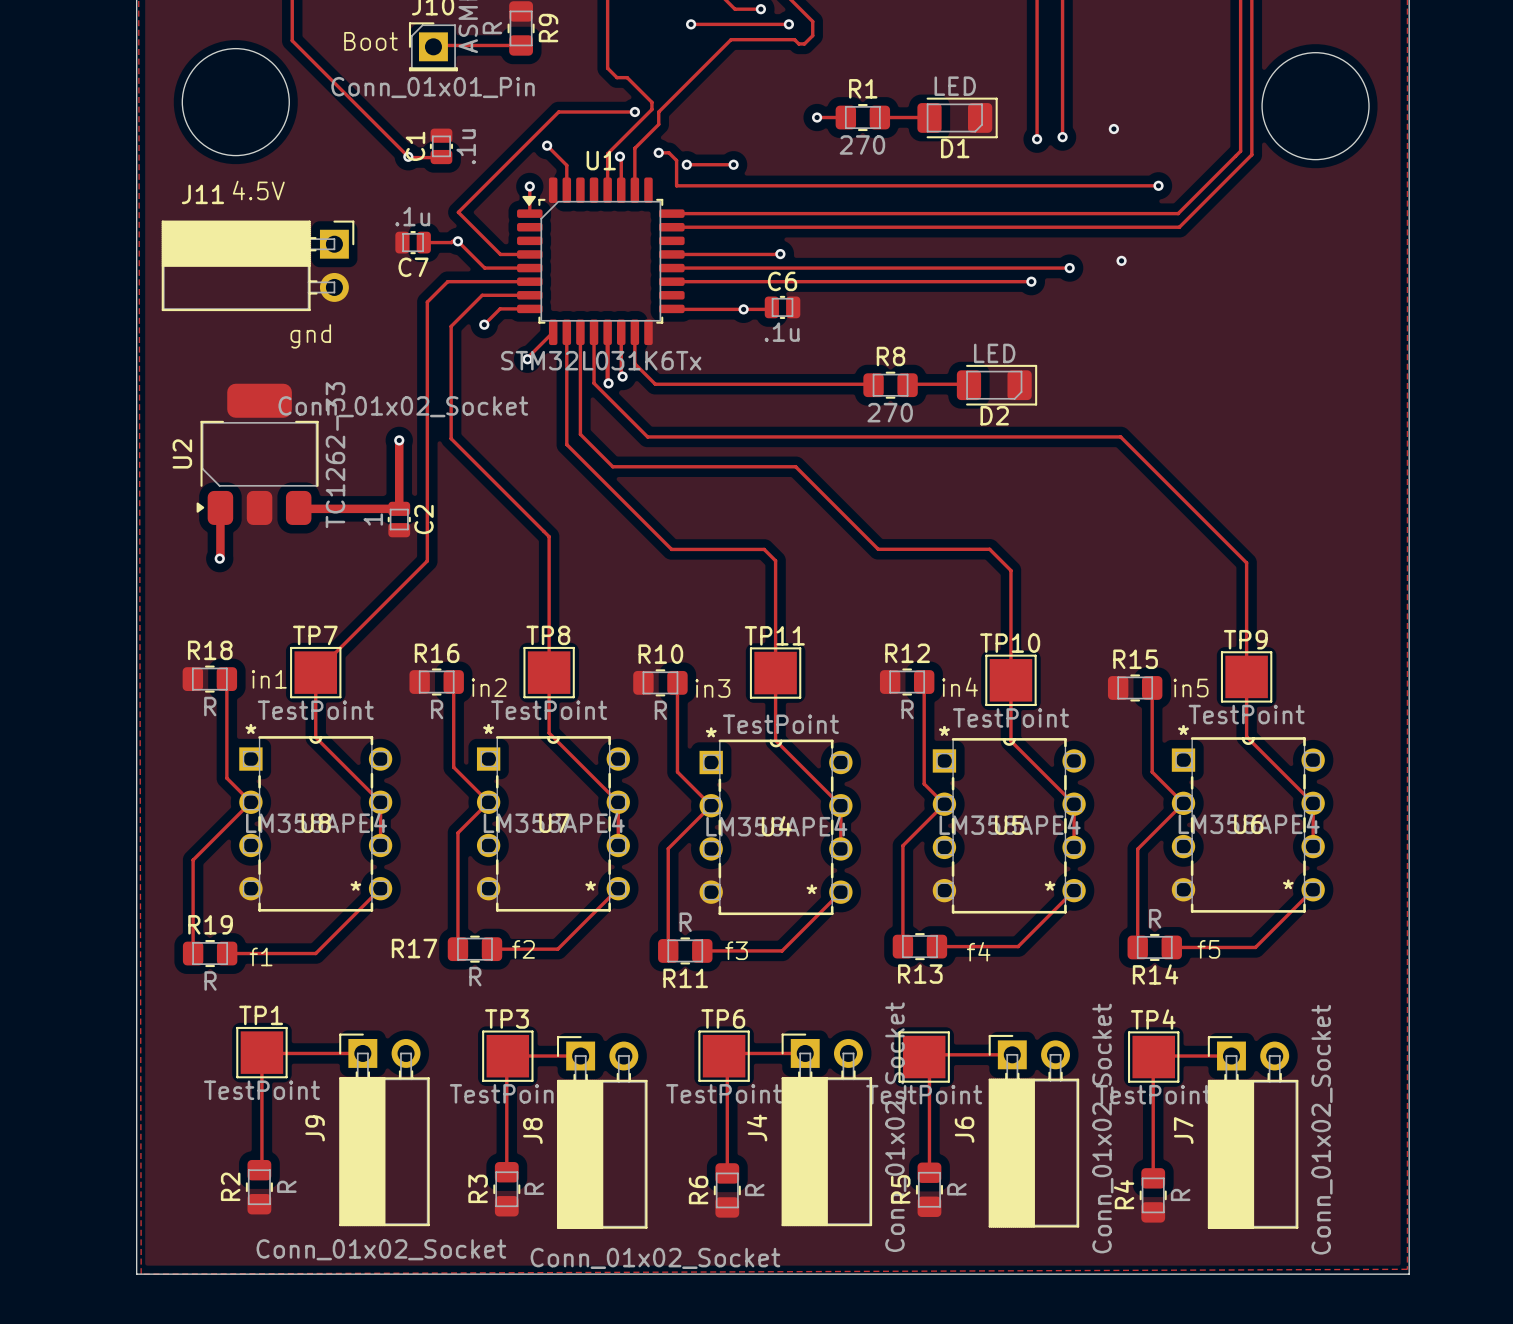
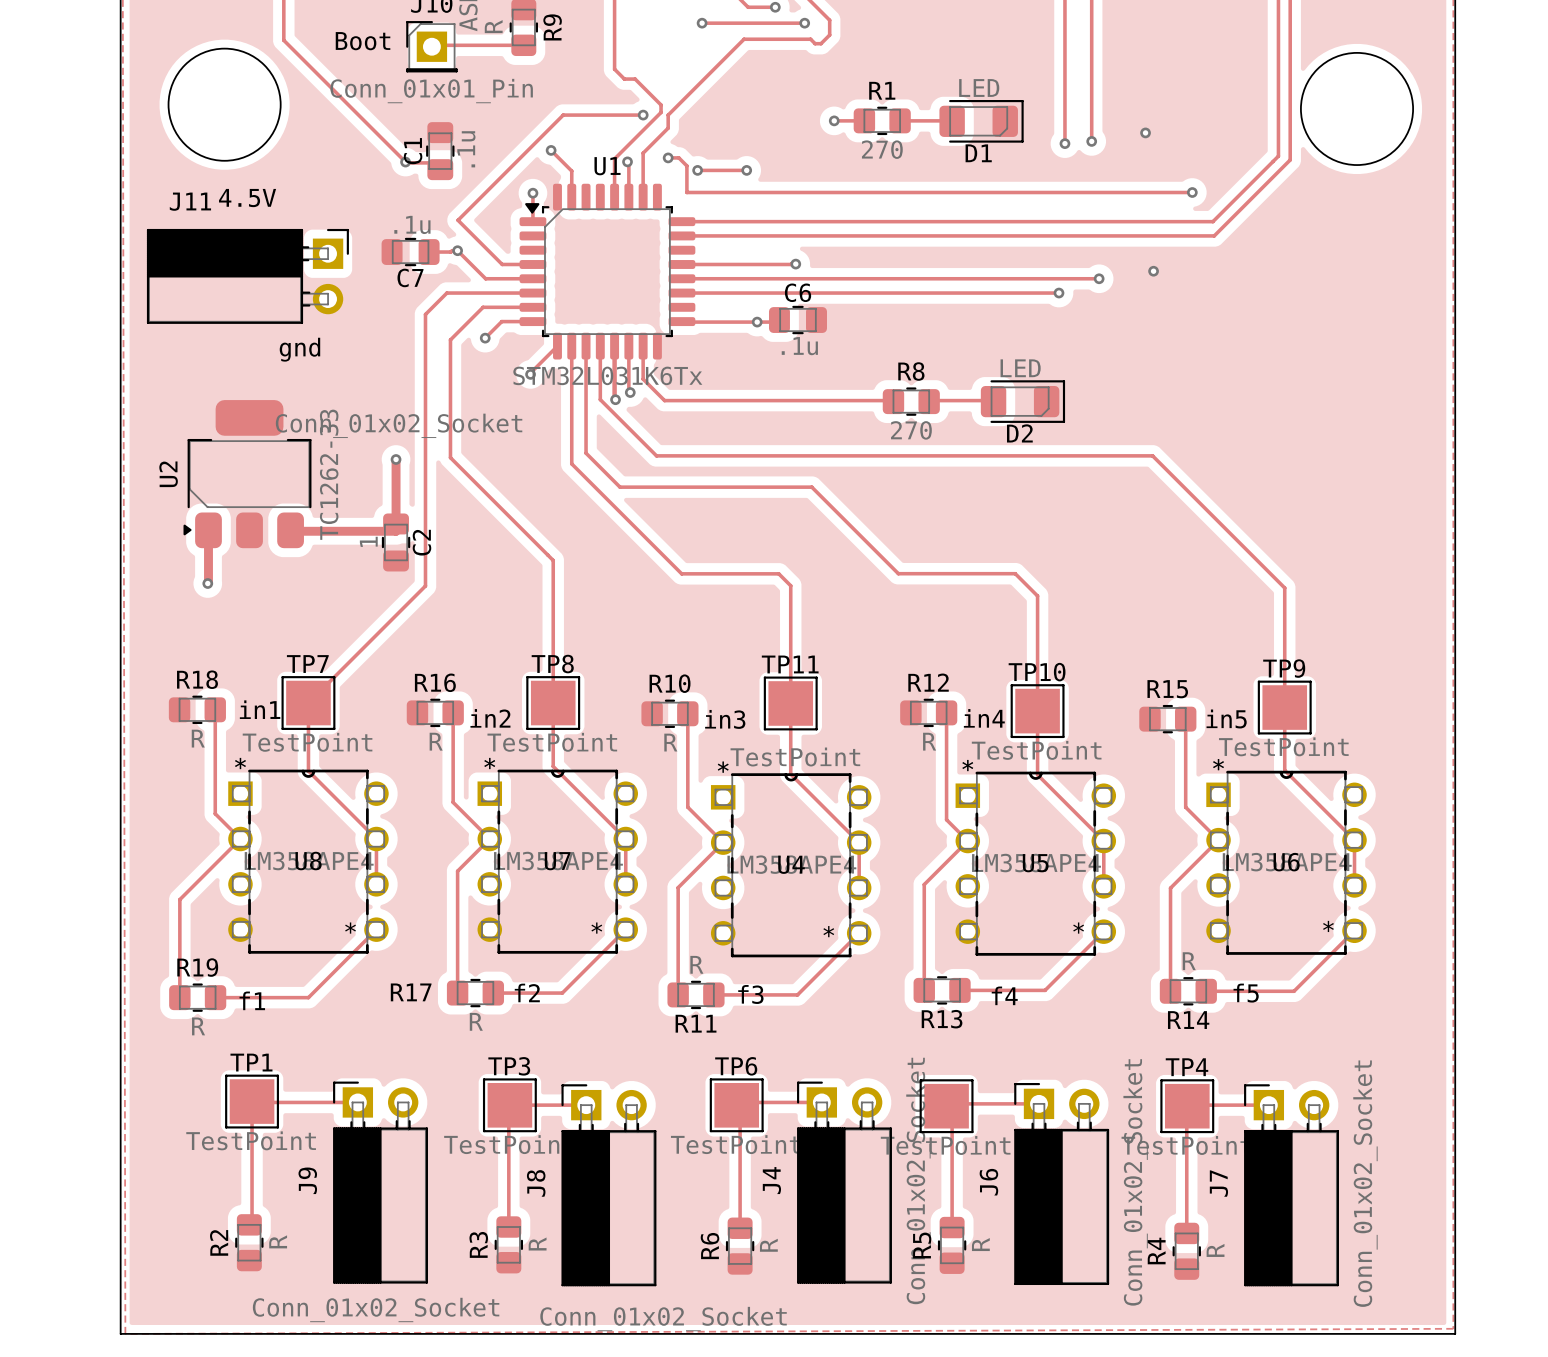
C1 footprint: [429, 128, 454, 165] -> [426, 122, 455, 181]
C7 footprint: [395, 231, 431, 255] -> [381, 237, 440, 267]
C6 footprint: [764, 295, 801, 319] -> [768, 305, 827, 335]
C2 footprint: [387, 501, 411, 538] -> [381, 513, 411, 572]

